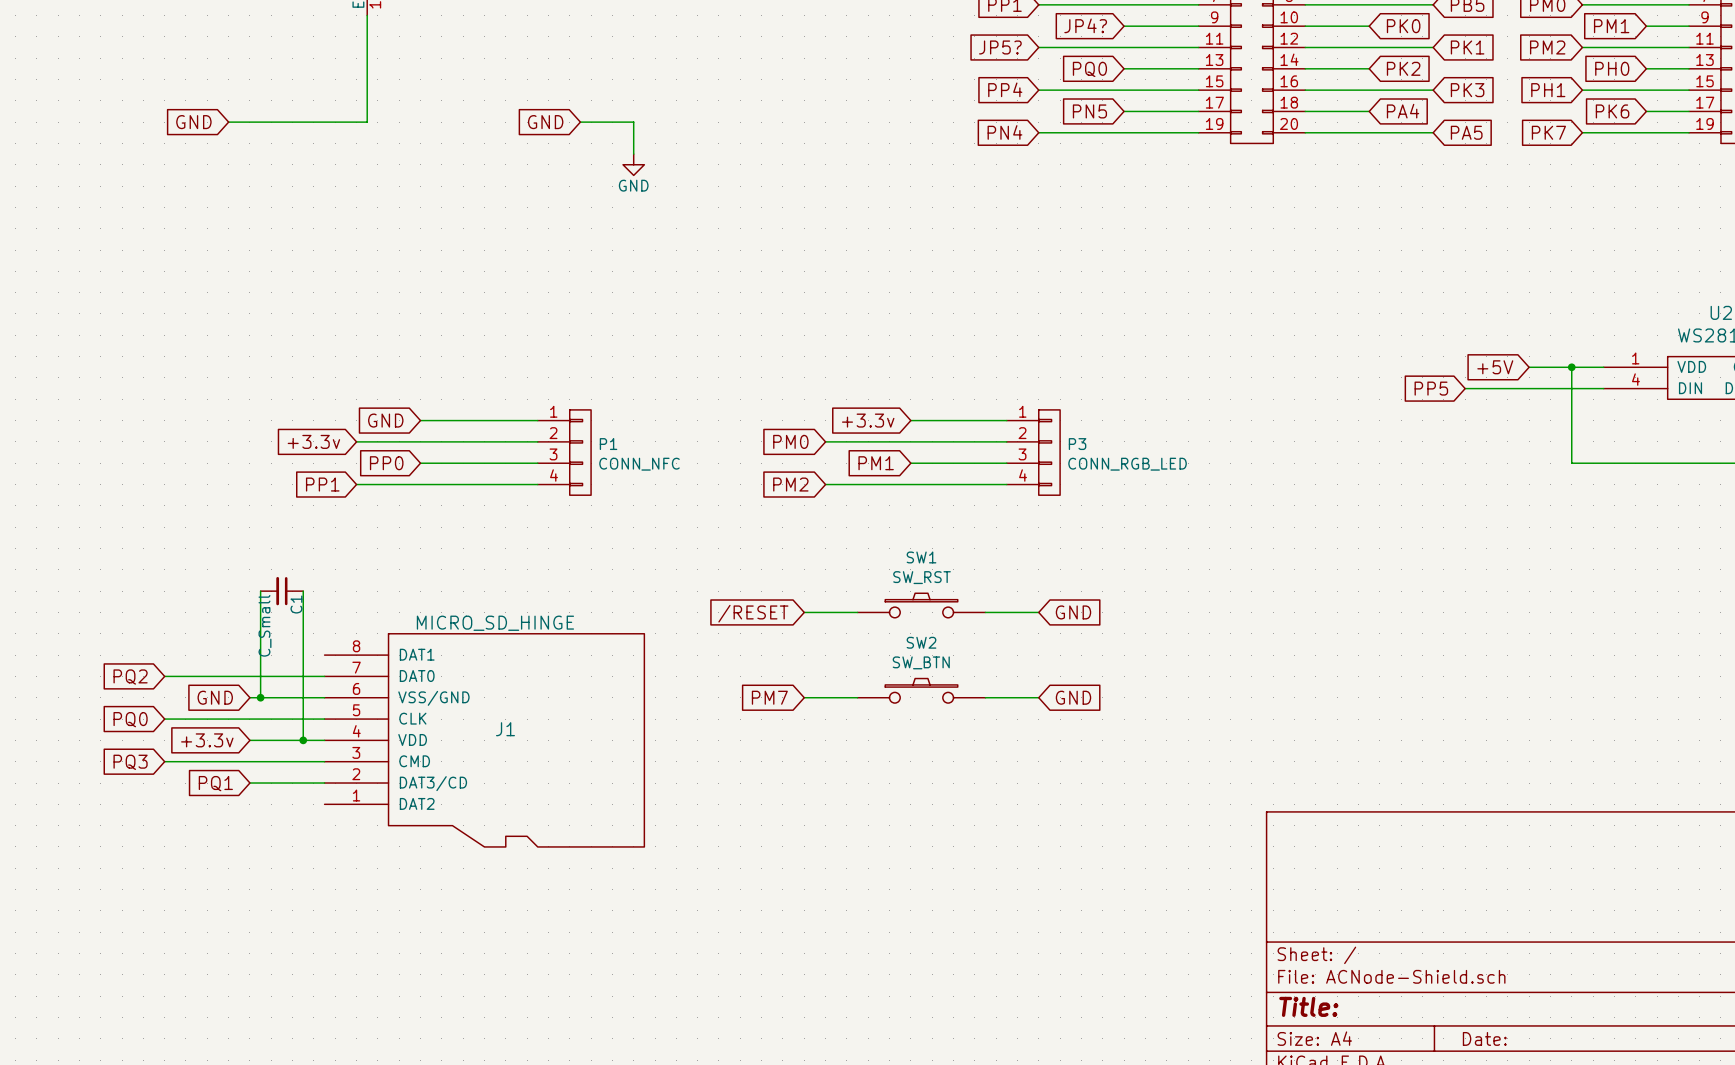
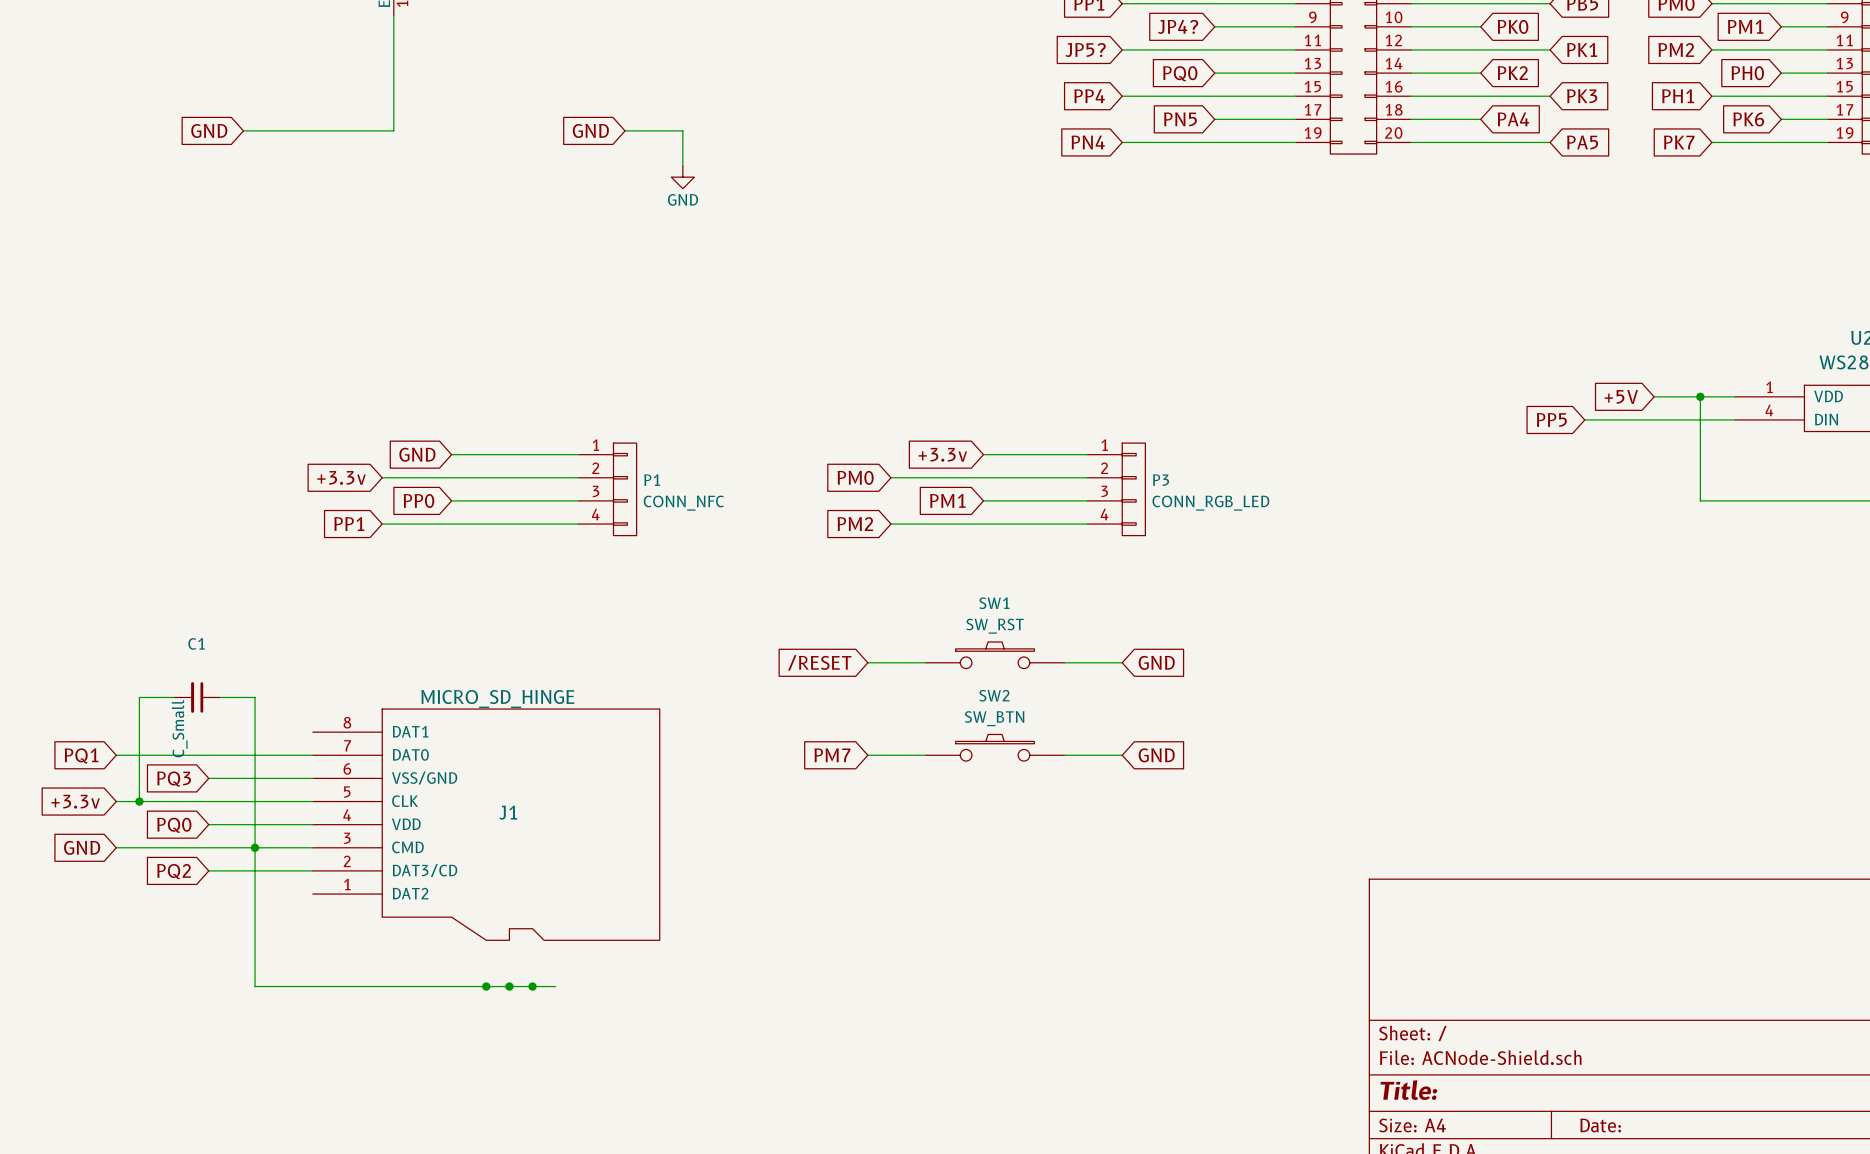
wire: (260, 591) (260, 697) -> none
C1 position: (281, 591) -> (197, 697)
wire: (303, 591) (303, 740) -> none
C1 name rotation: 0° (296, 604) -> 90° clockwise (196, 643)
C1 name position: C1 (296, 604) -> C1 (196, 643)
wire: none -> (174, 697) (139, 697) (139, 801)
wire: none -> (220, 697) (255, 697) (255, 986) (555, 986)
wire: (164, 676) (324, 676) -> none
global label position: PQ2 (130, 677) -> PQ2 (174, 871)
wire: none -> (116, 755) (266, 755)
global label position: GND (215, 697) -> GND (82, 847)
junction: (260, 697) -> none
global label position: PQ0 (130, 719) -> PQ0 (174, 825)
wire: (164, 719) (196, 719) -> none
wire: none -> (116, 801) (266, 801)
junction: none -> (139, 801)
global label position: +3.3v (207, 740) -> +3.3v (75, 801)
junction: (303, 740) -> none
J1 position: (484, 740) -> (486, 824)
wire: (164, 761) (196, 761) -> none
global label position: PQ3 (130, 762) -> PQ3 (174, 779)
wire: none -> (116, 847) (266, 847)
global label position: PQ1 (215, 783) -> PQ1 (81, 755)
junction: none -> (255, 847)
wire: none -> (208, 870) (312, 870)
junction: none -> (486, 986)
junction: none -> (509, 986)
junction: none -> (532, 986)

